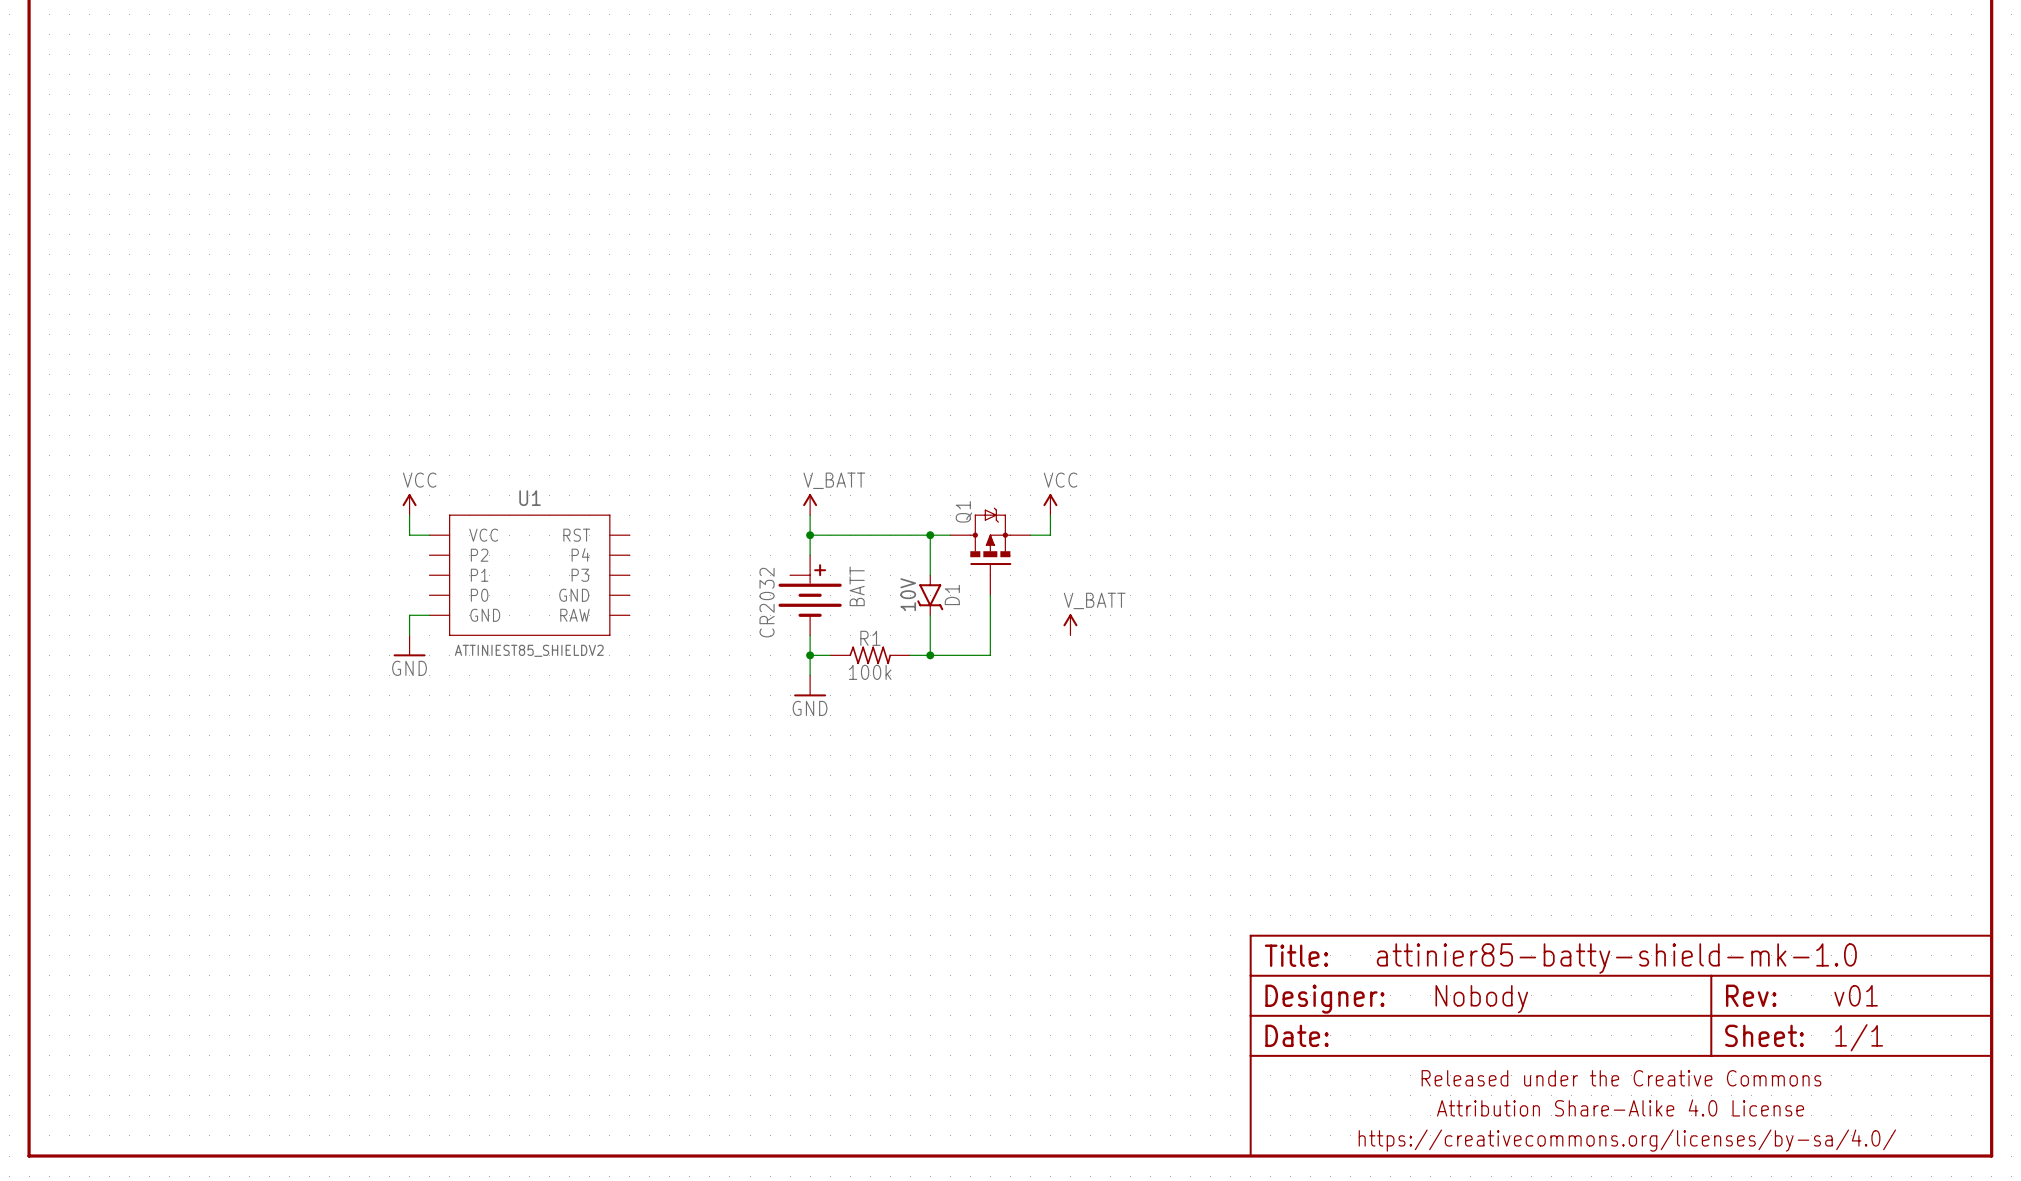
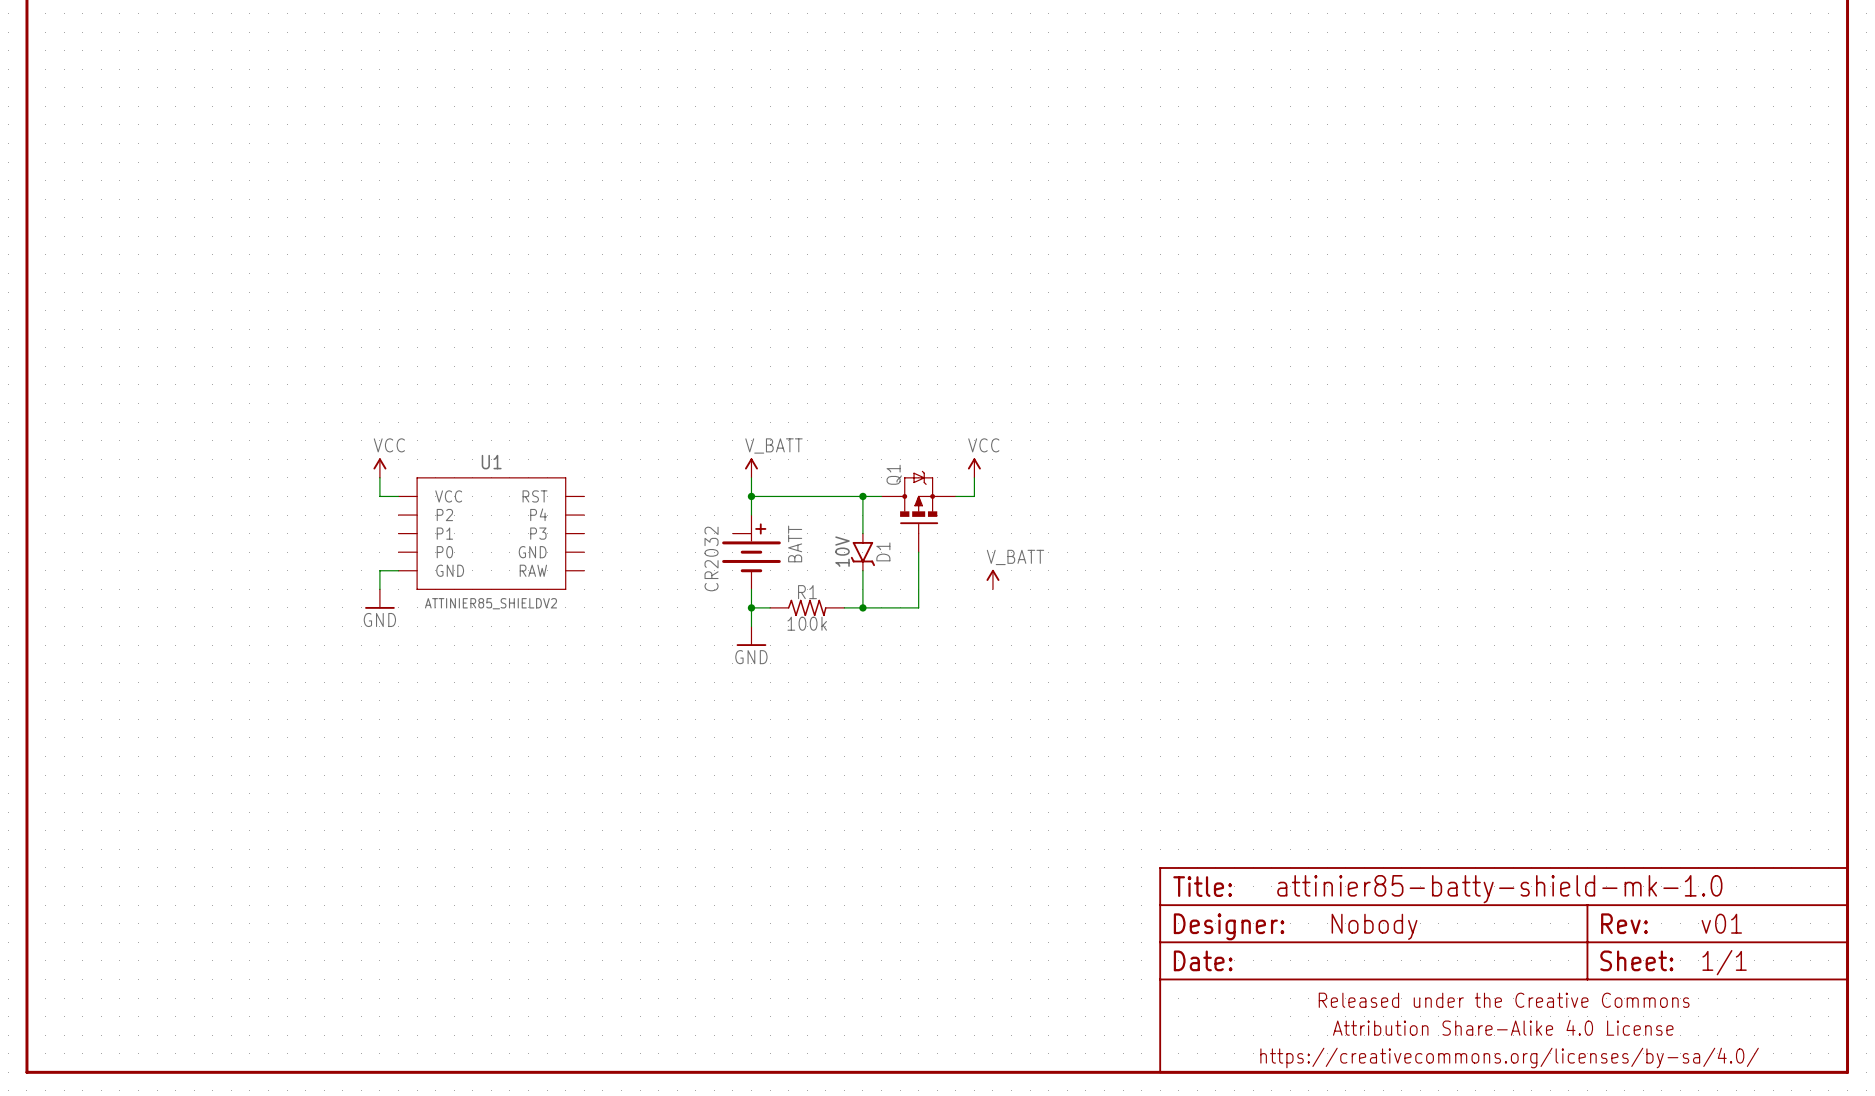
U1 value: ATTINIEST85_SHIELDV2 (529, 650) -> ATTINIER85_SHIELDV2 (491, 603)

